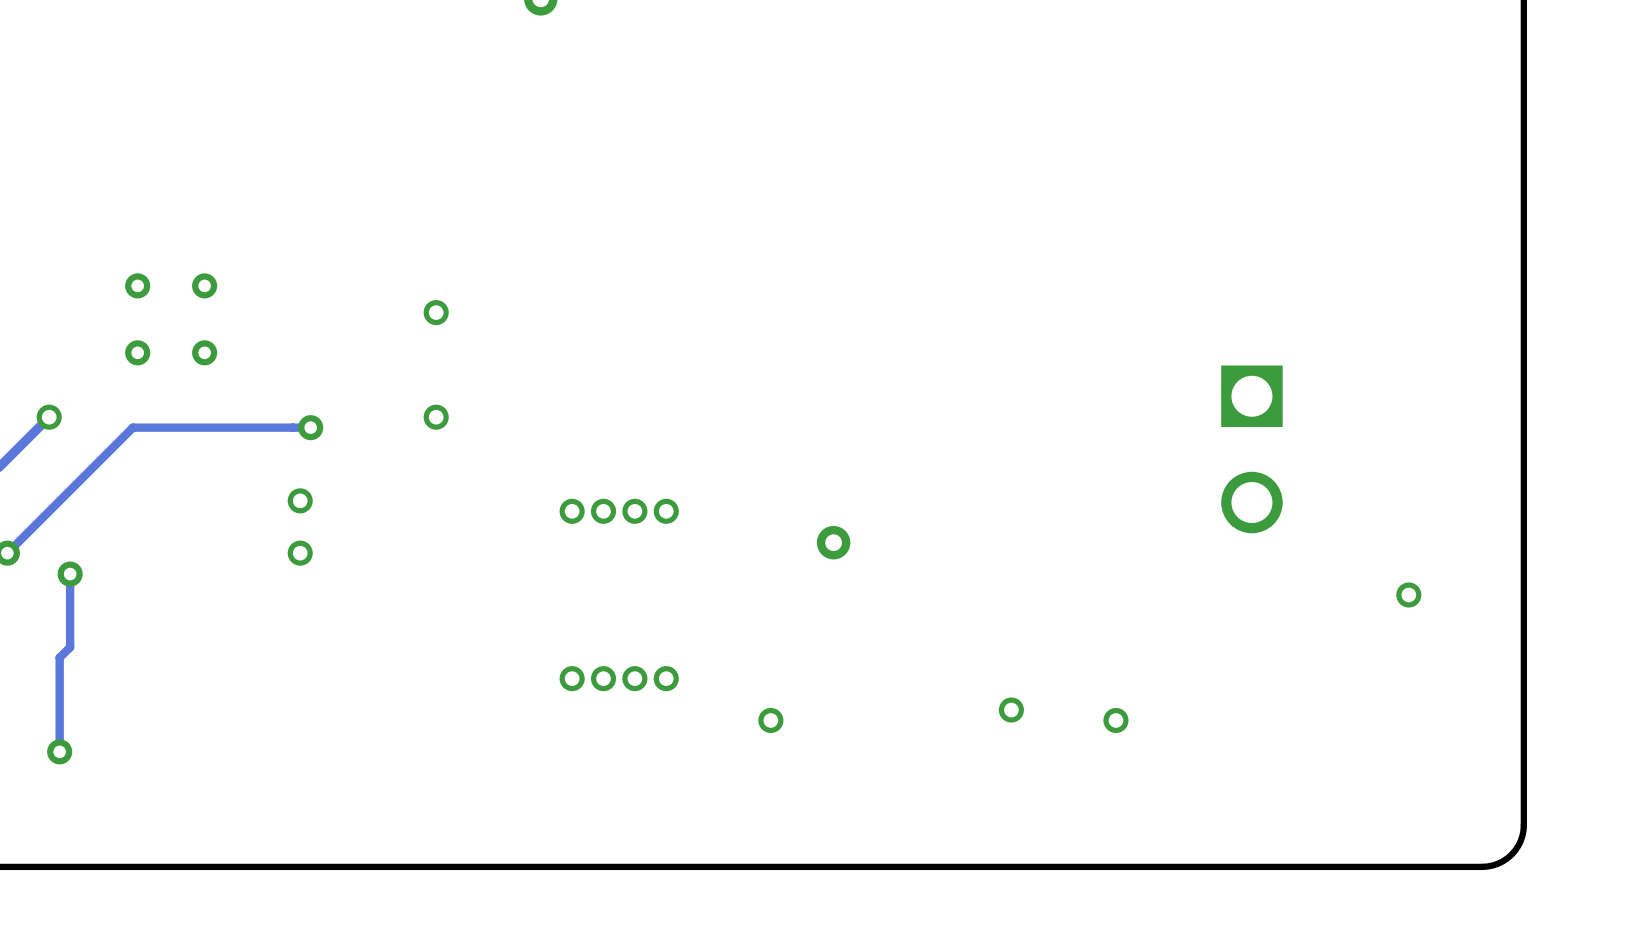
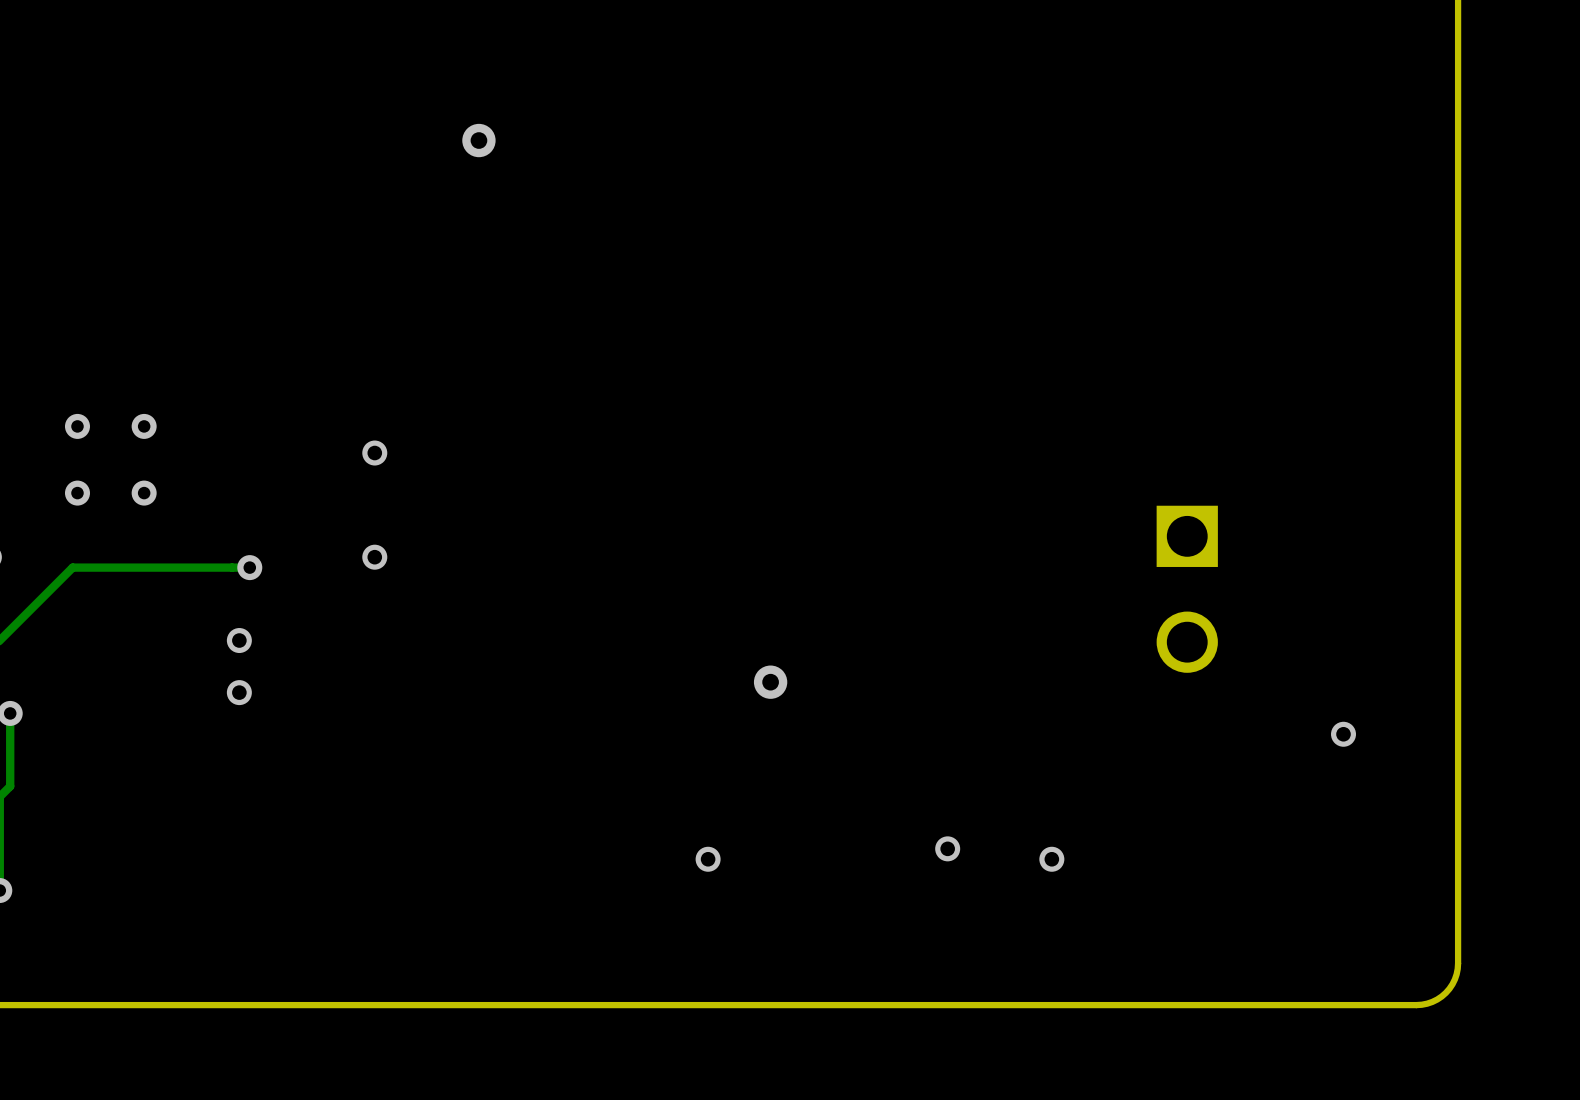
via: (572, 511) -> none
via: (603, 511) -> none
via: (634, 511) -> none
via: (666, 511) -> none
via: (572, 678) -> none
via: (603, 678) -> none
via: (634, 678) -> none
via: (666, 678) -> none

